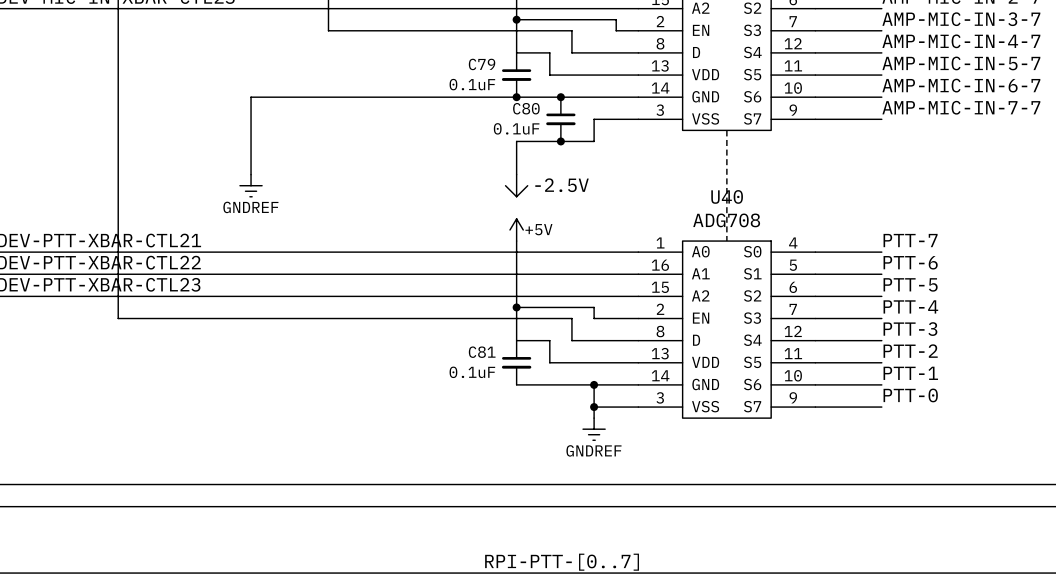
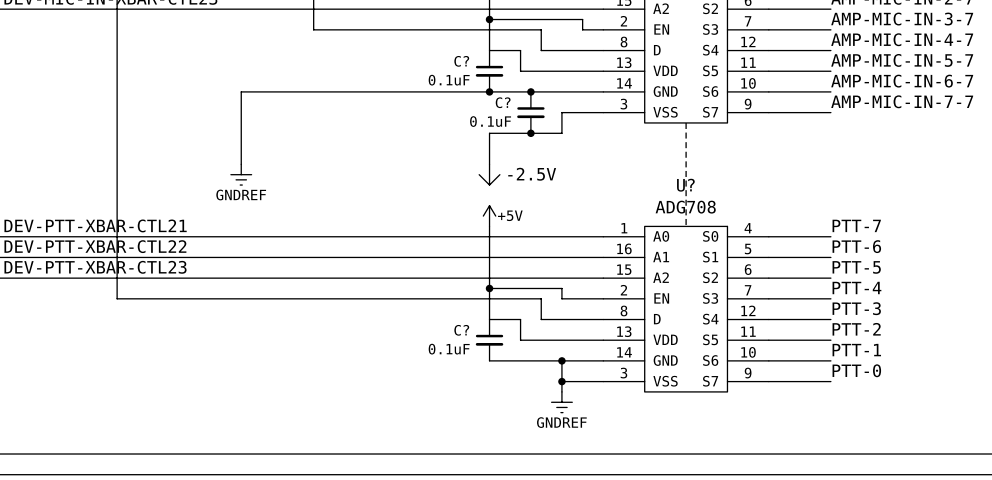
C79 name: C79 (482, 64) -> C? (461, 61)
C80 name: C80 (526, 108) -> C? (503, 102)
U40 name: U40 (727, 196) -> U? (685, 185)
C81 name: C81 (482, 352) -> C? (461, 330)

